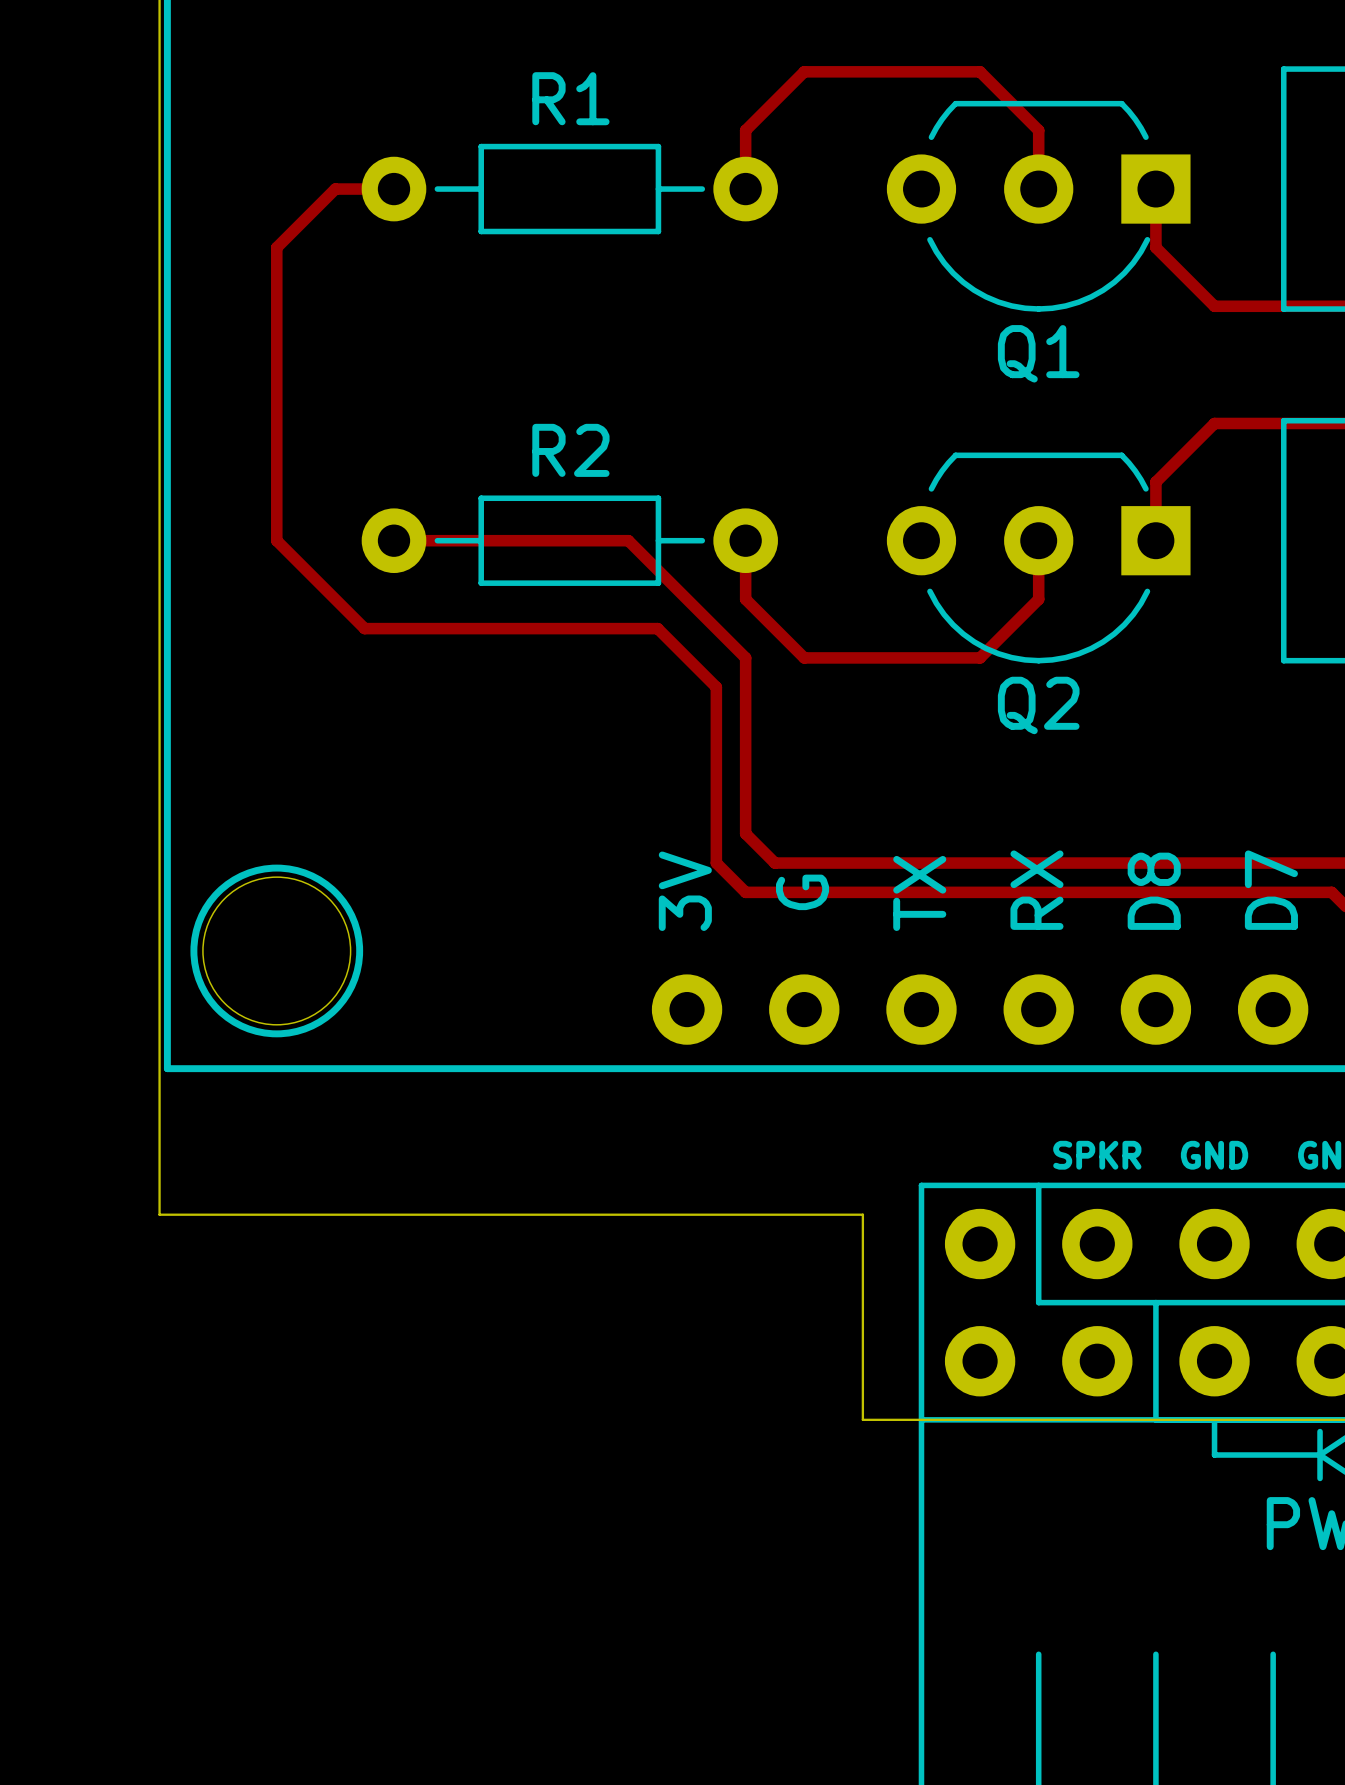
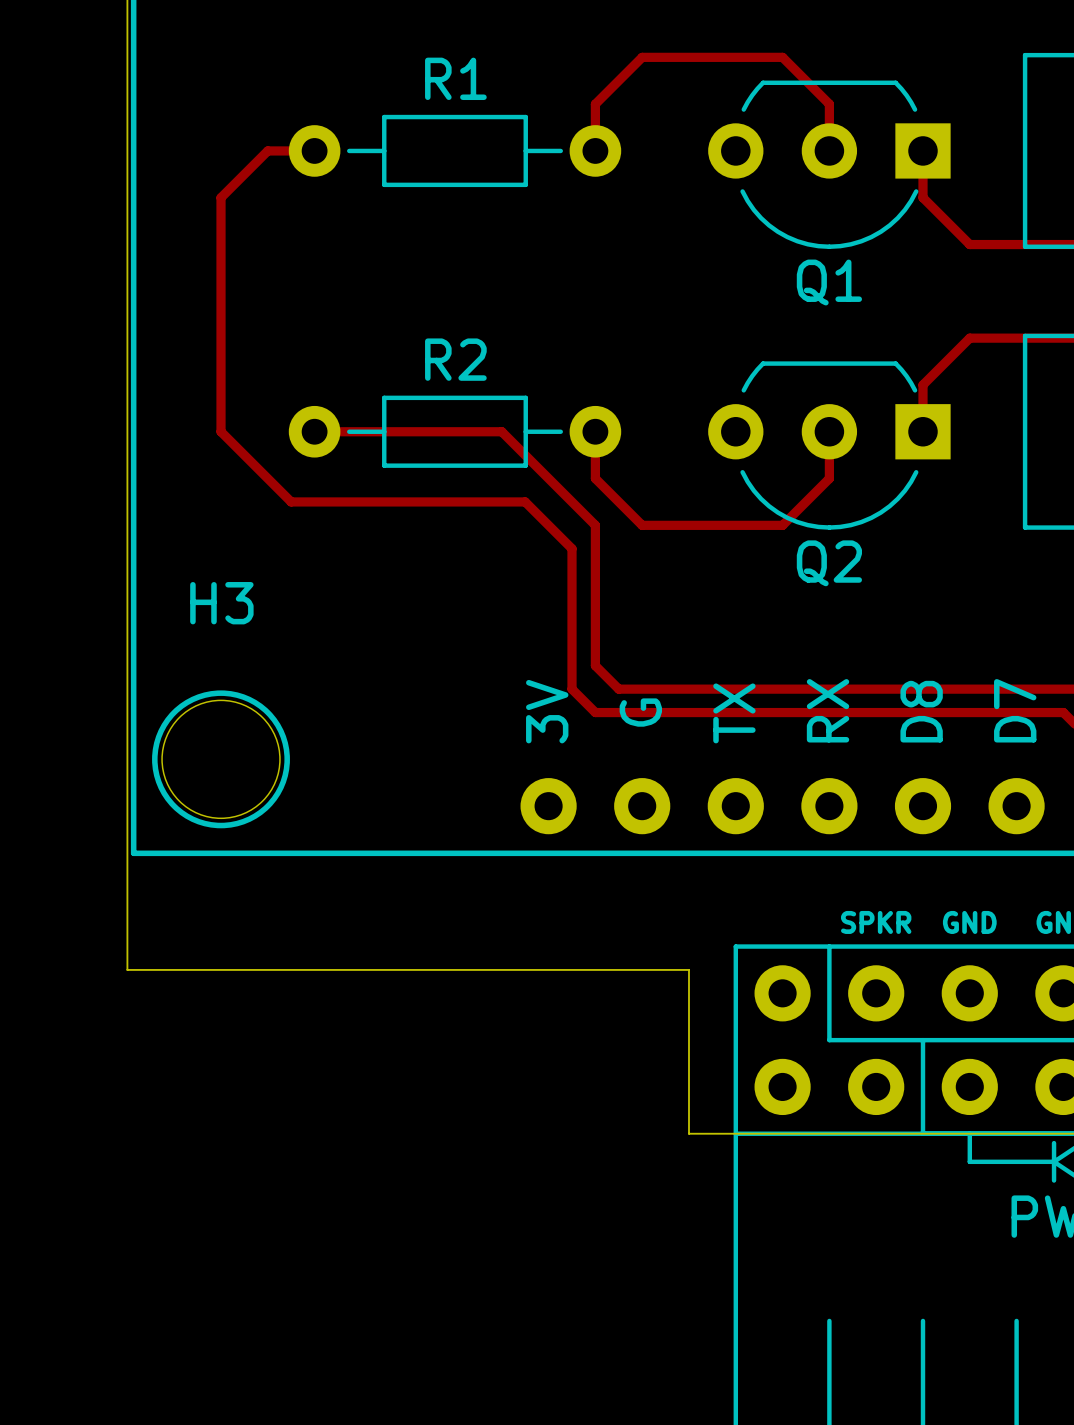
H3 name: none -> H3 (221, 603)

